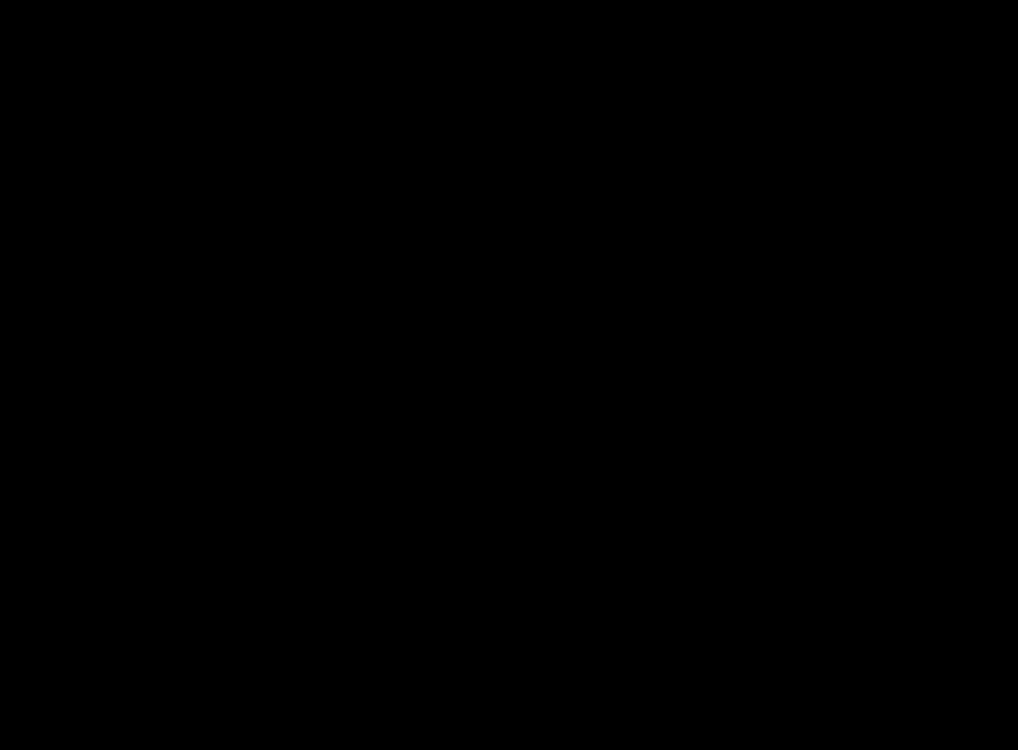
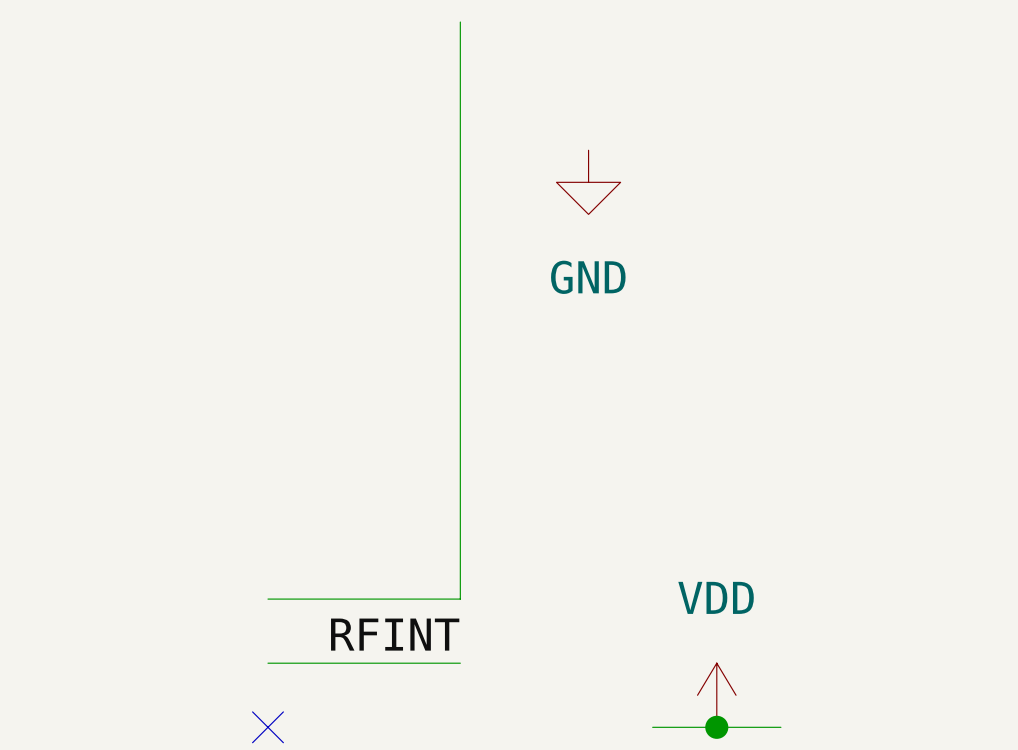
wire: none -> (460, 22) (460, 599) (267, 599)
power symbol: none -> GND (588, 182)
label: none -> RFINT (395, 634)
wire: none -> (267, 663) (460, 663)
power symbol: none -> VDD (716, 695)
no-connect mark: none -> (267, 727)
wire: none -> (652, 727) (780, 727)
junction: none -> (716, 727)

